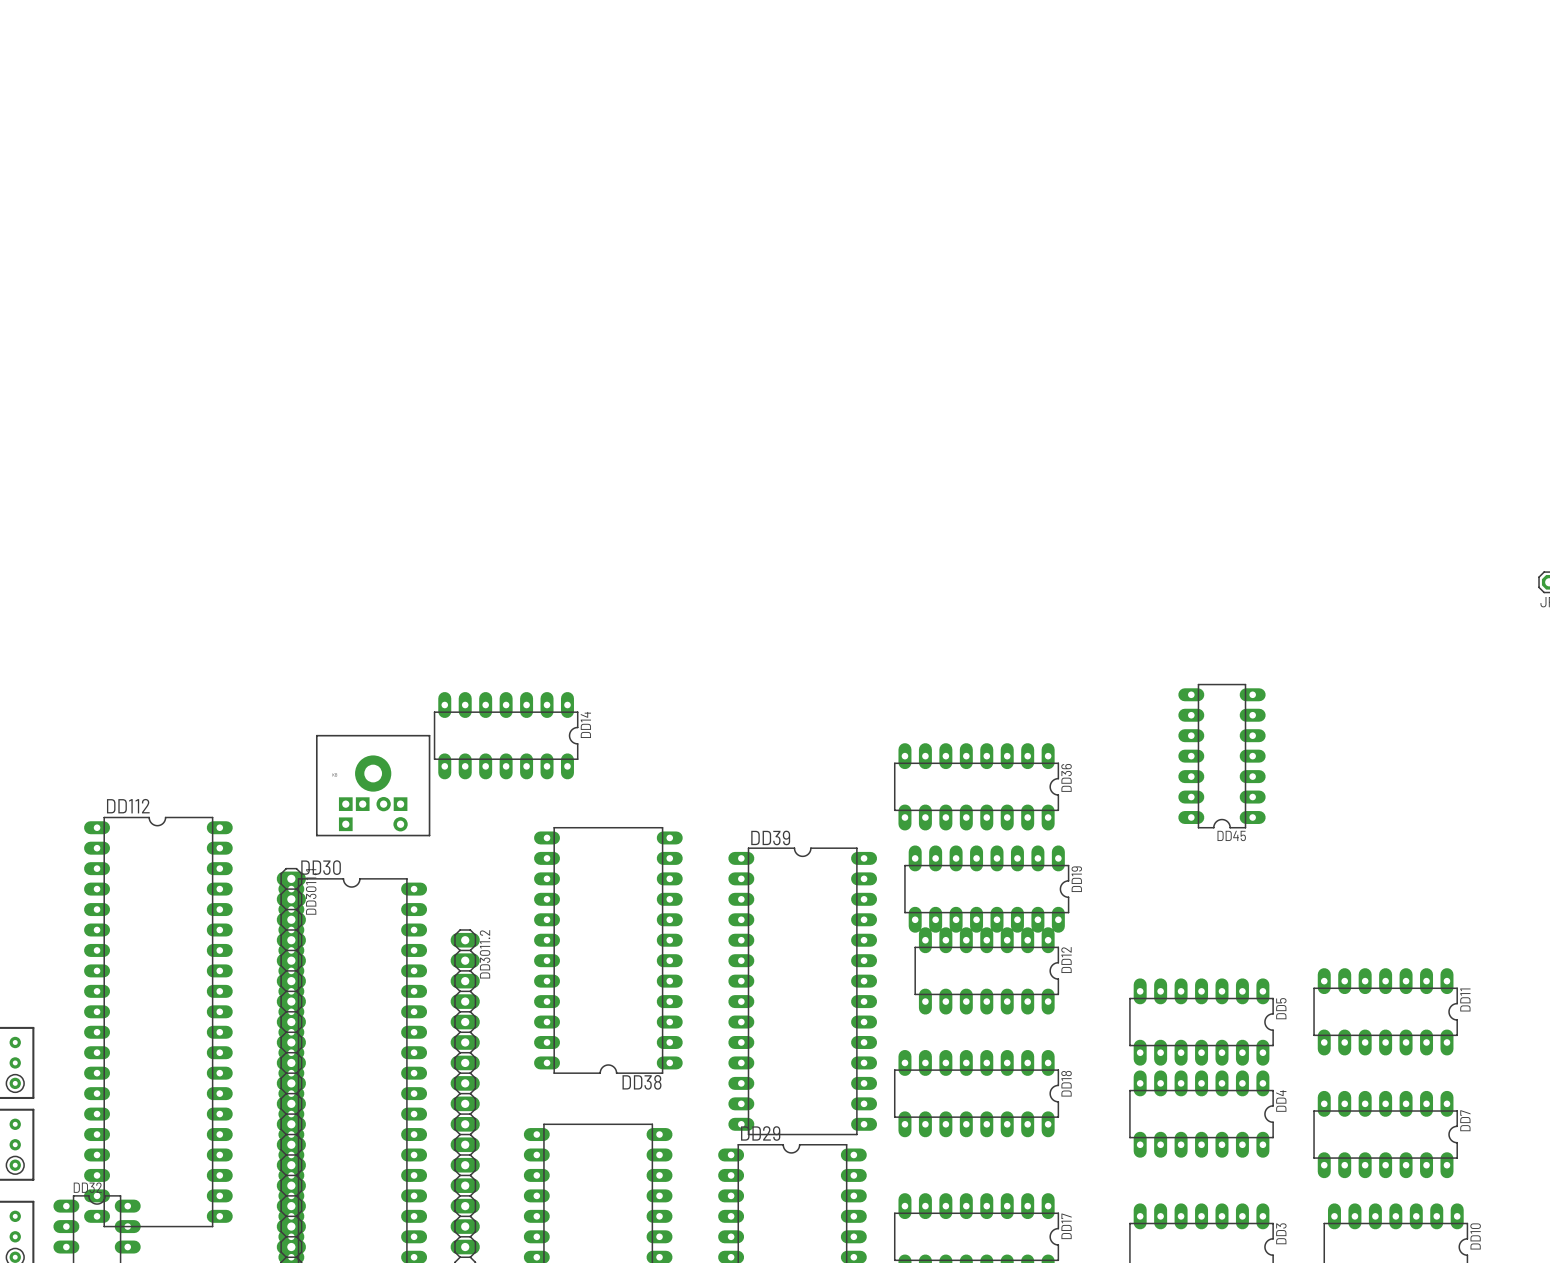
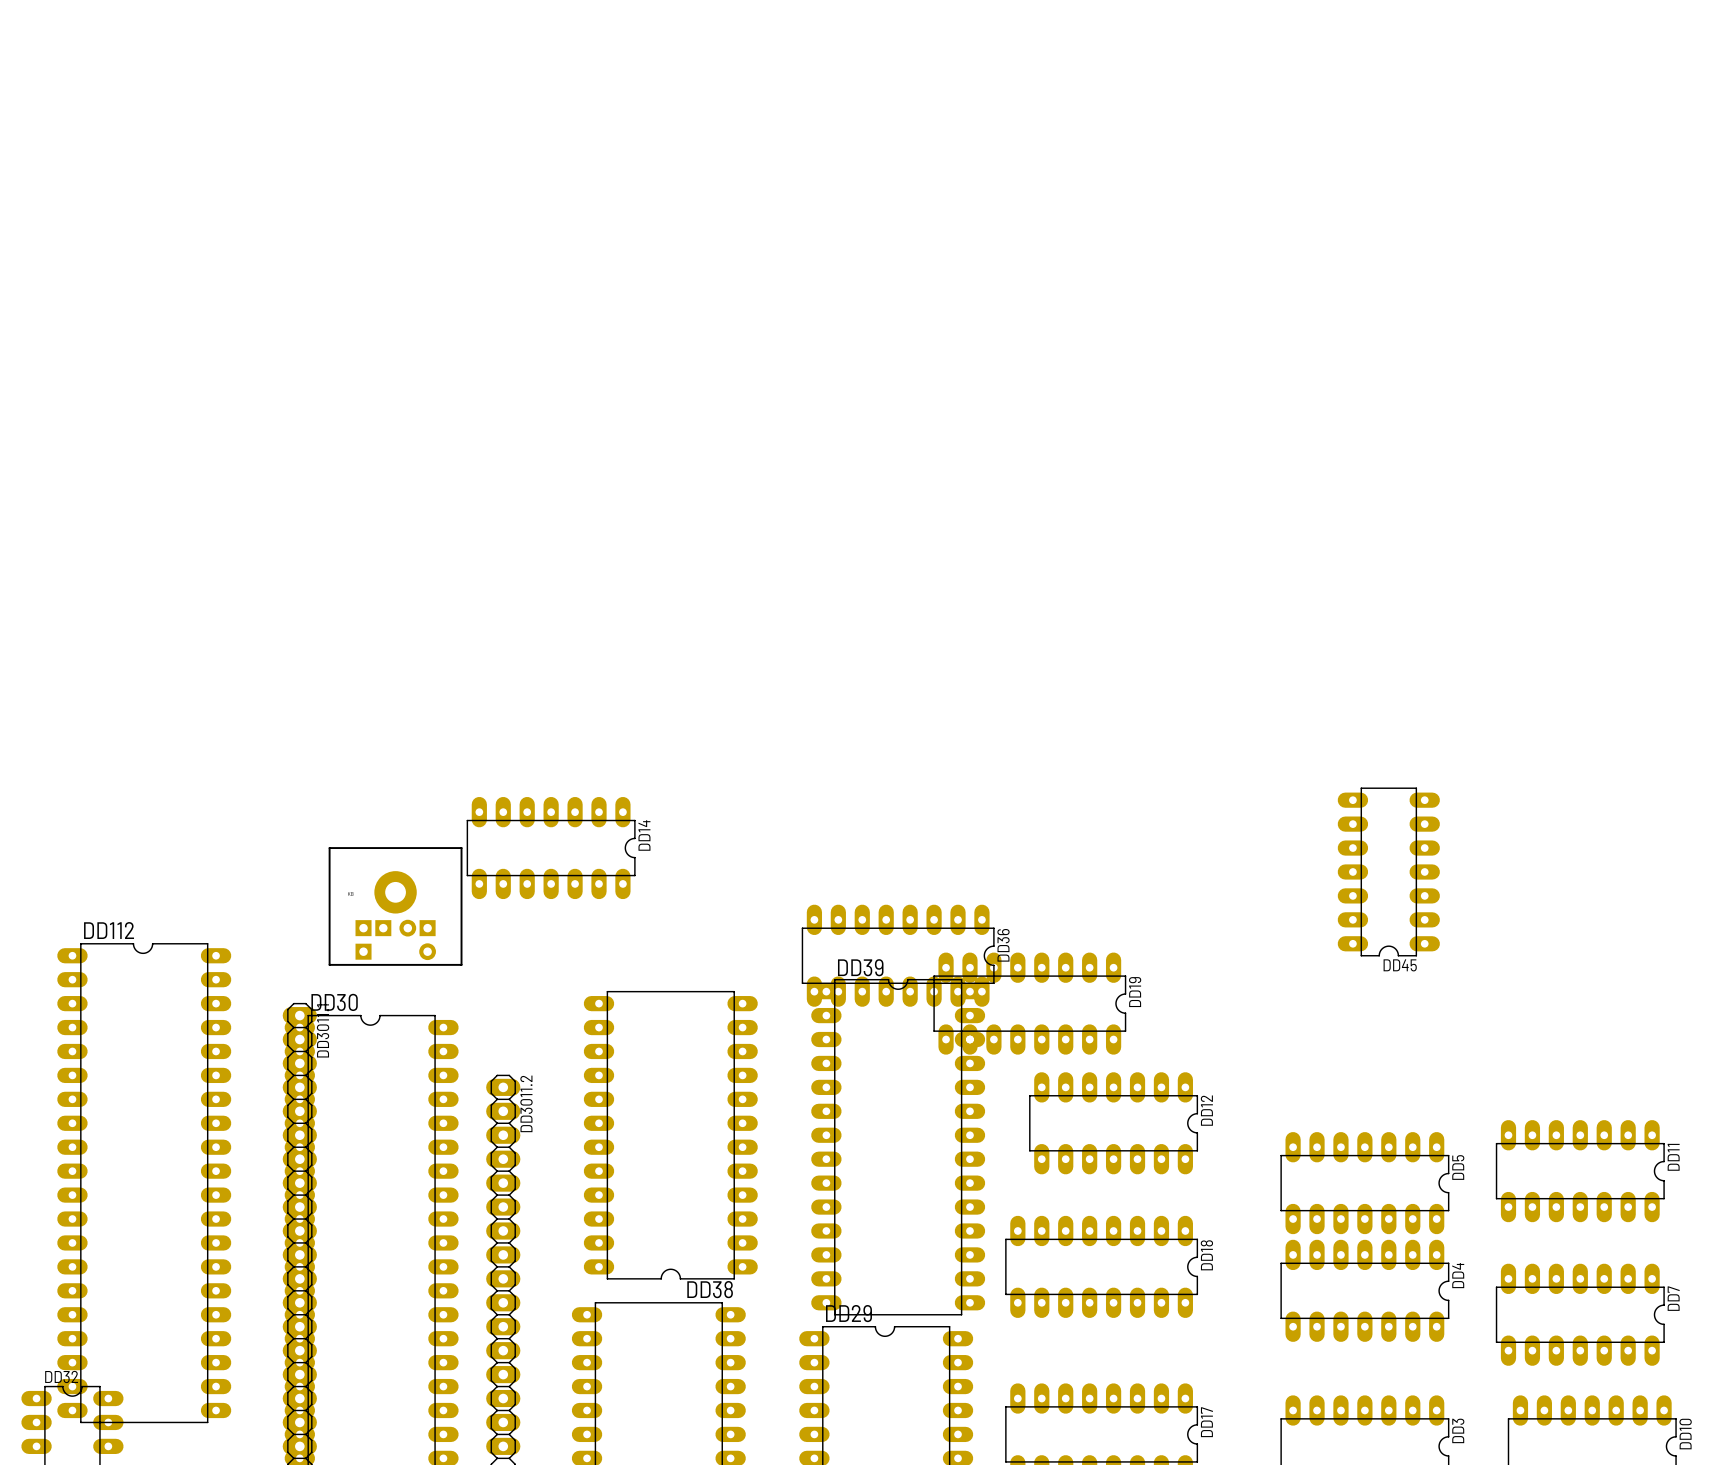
DD36 position: (976, 786) -> (898, 955)
DD19 position: (986, 889) -> (1029, 1003)
DD38 position: (608, 950) -> (670, 1135)

